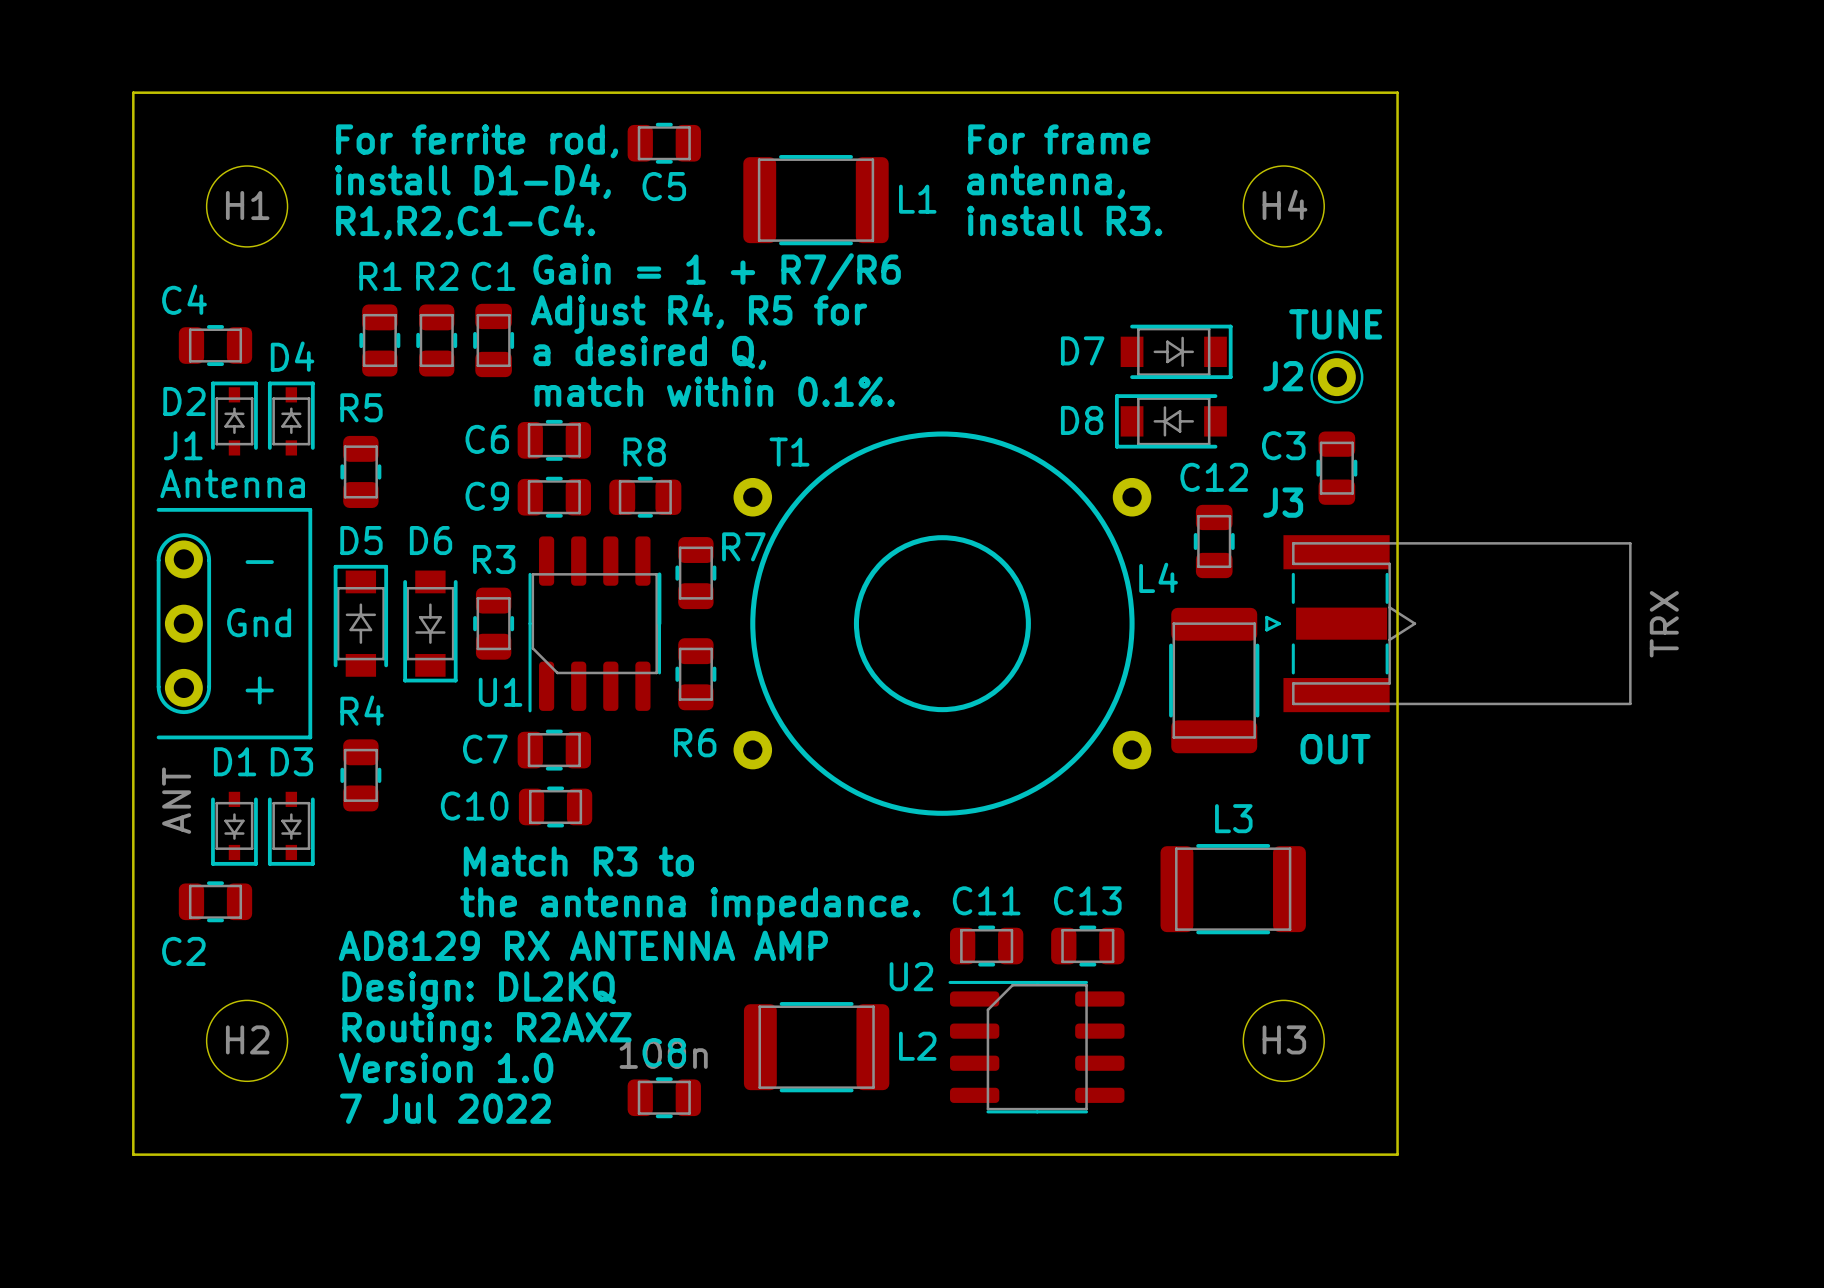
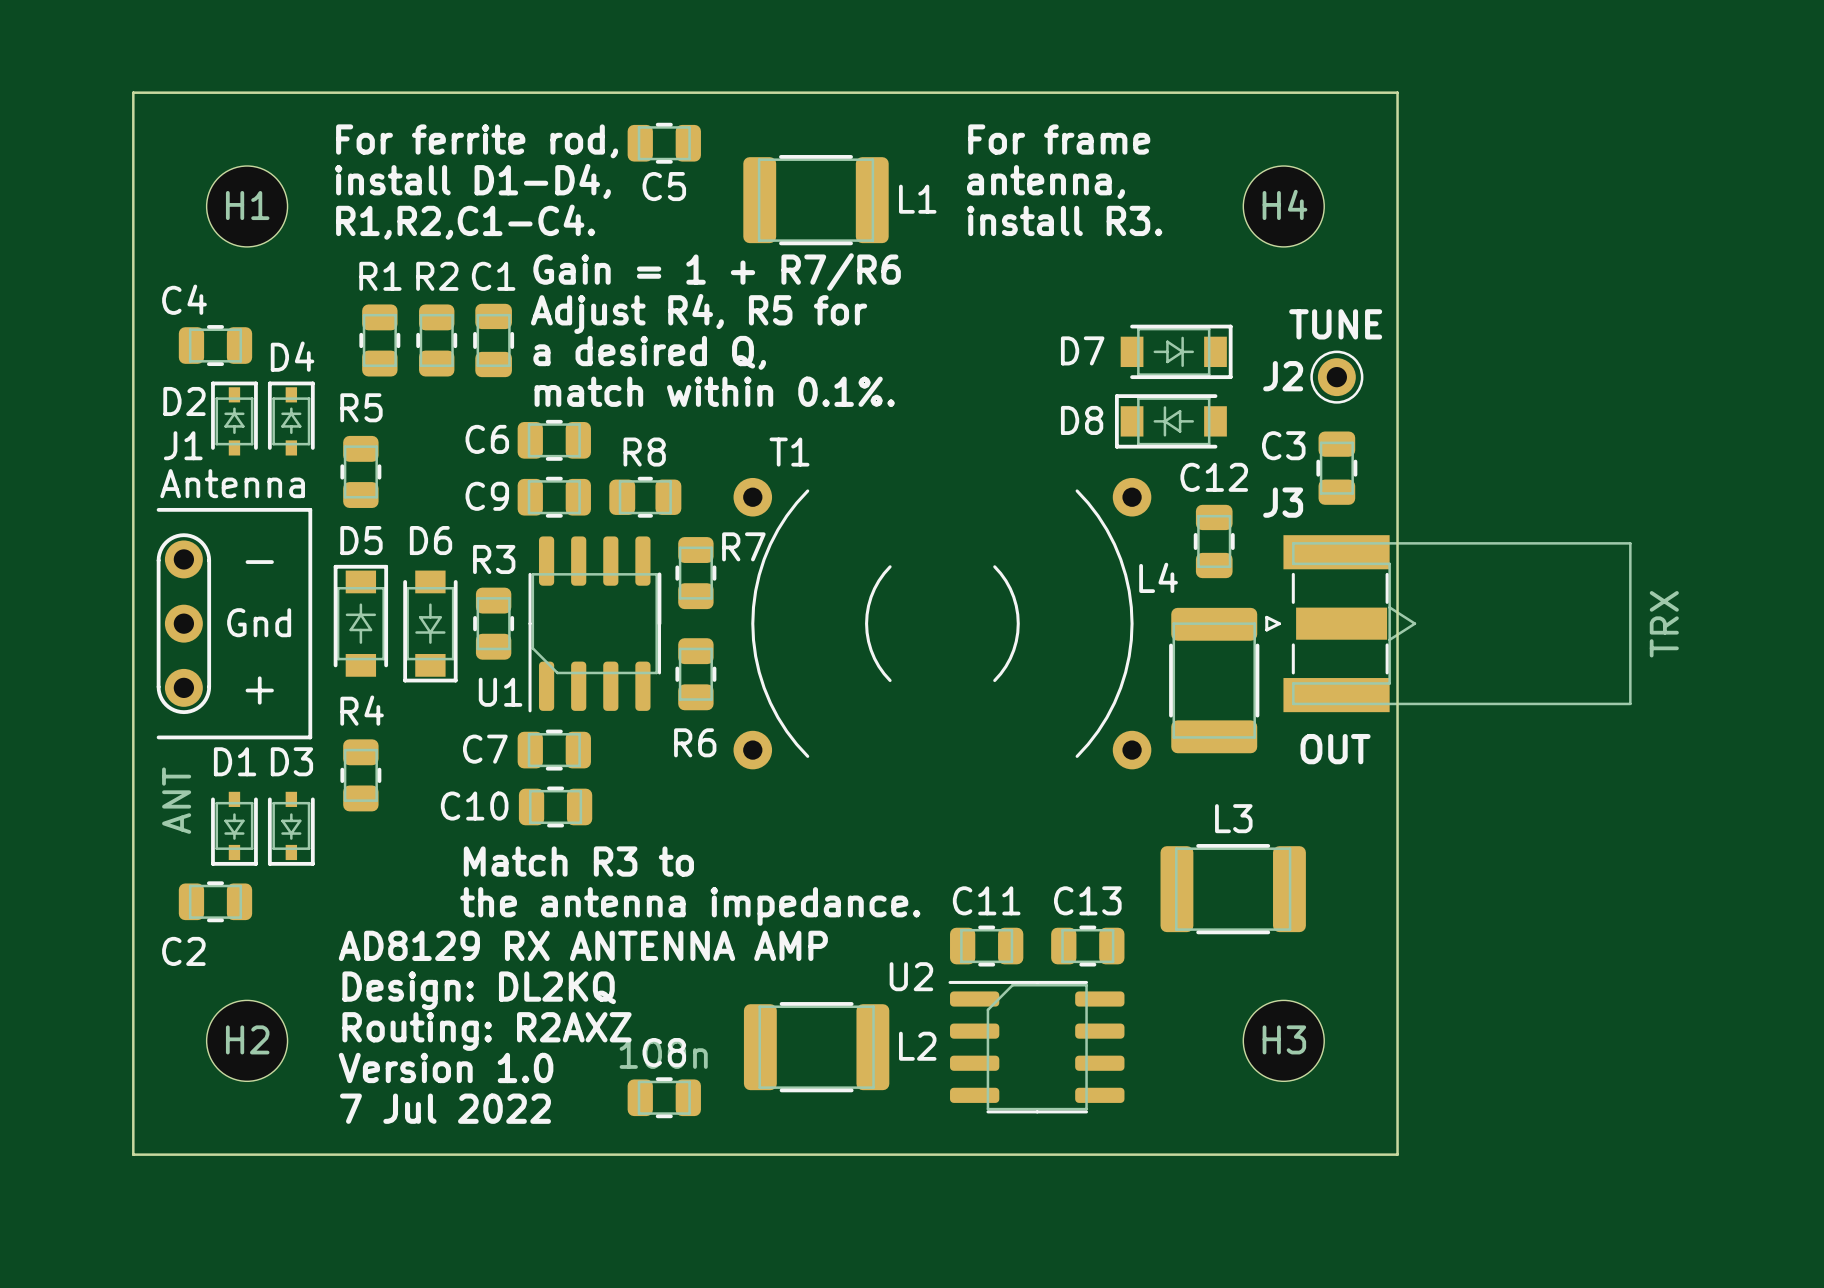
T1 footprint: [733, 431, 1152, 816] -> [733, 477, 1152, 770]

